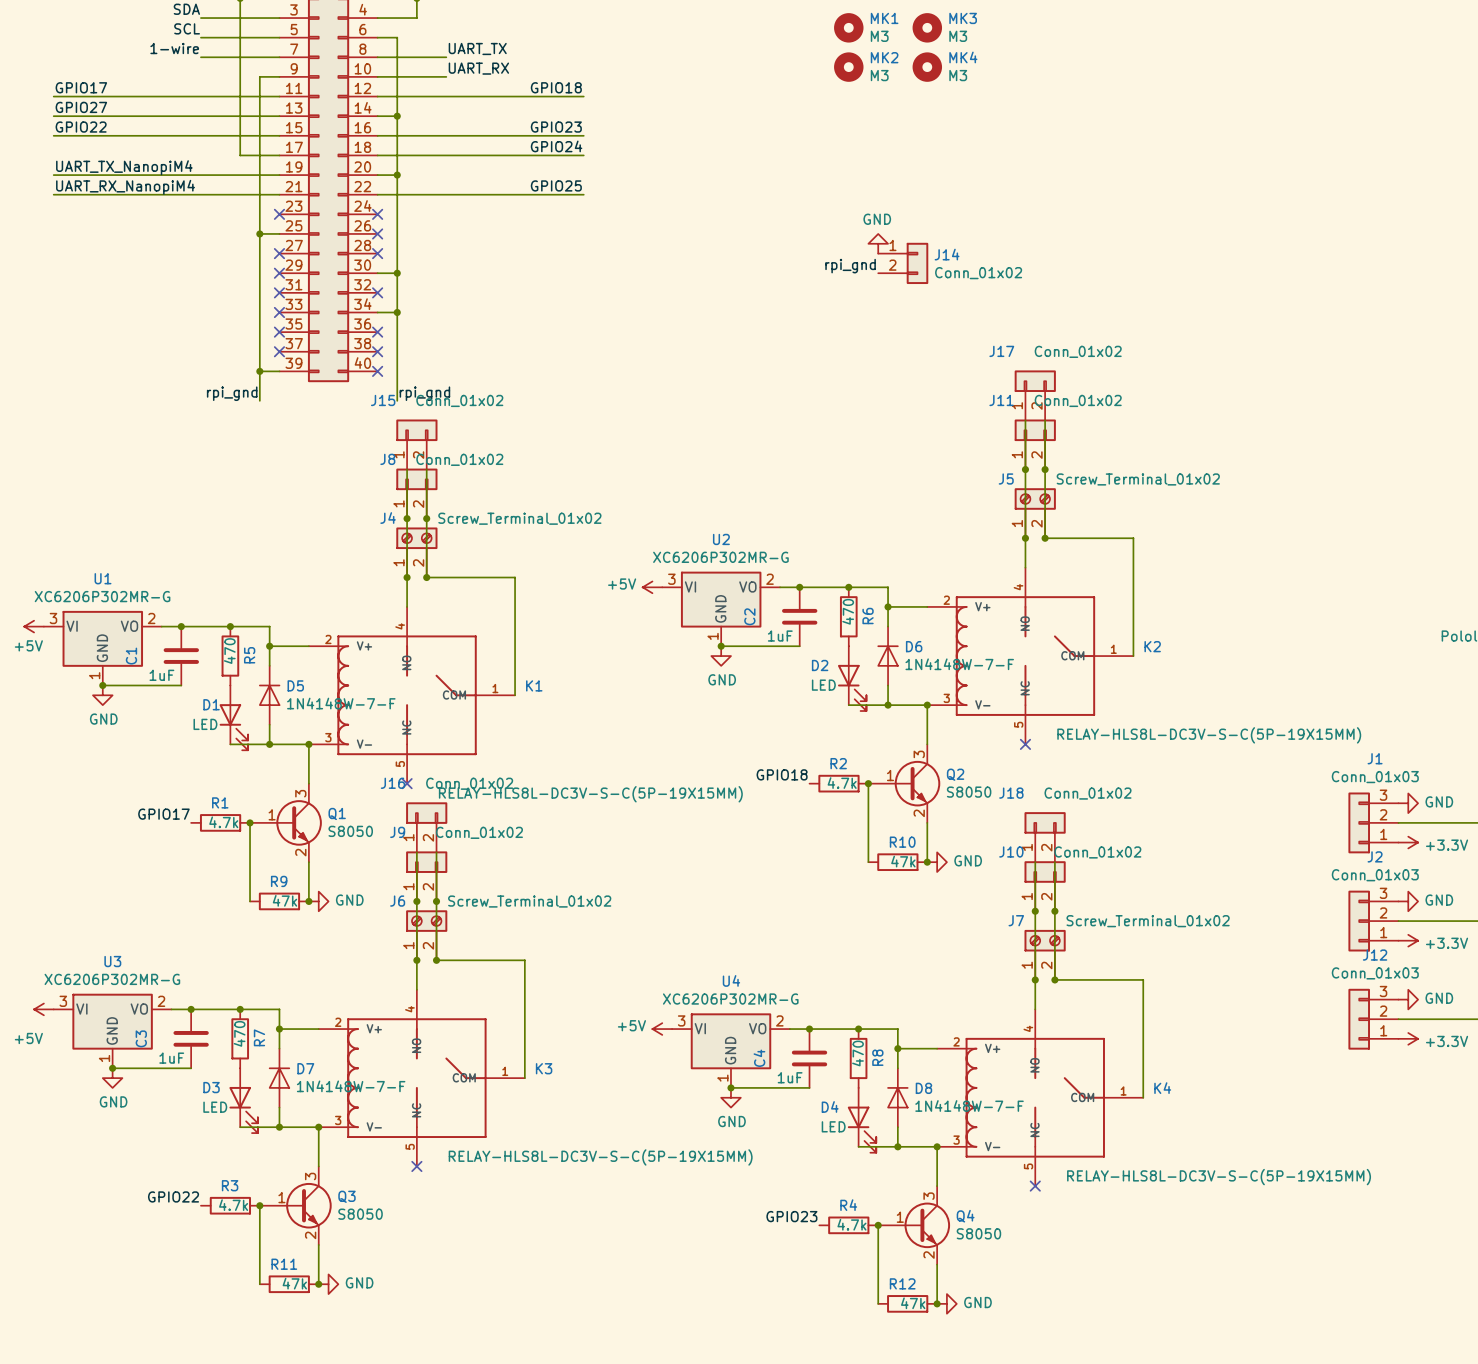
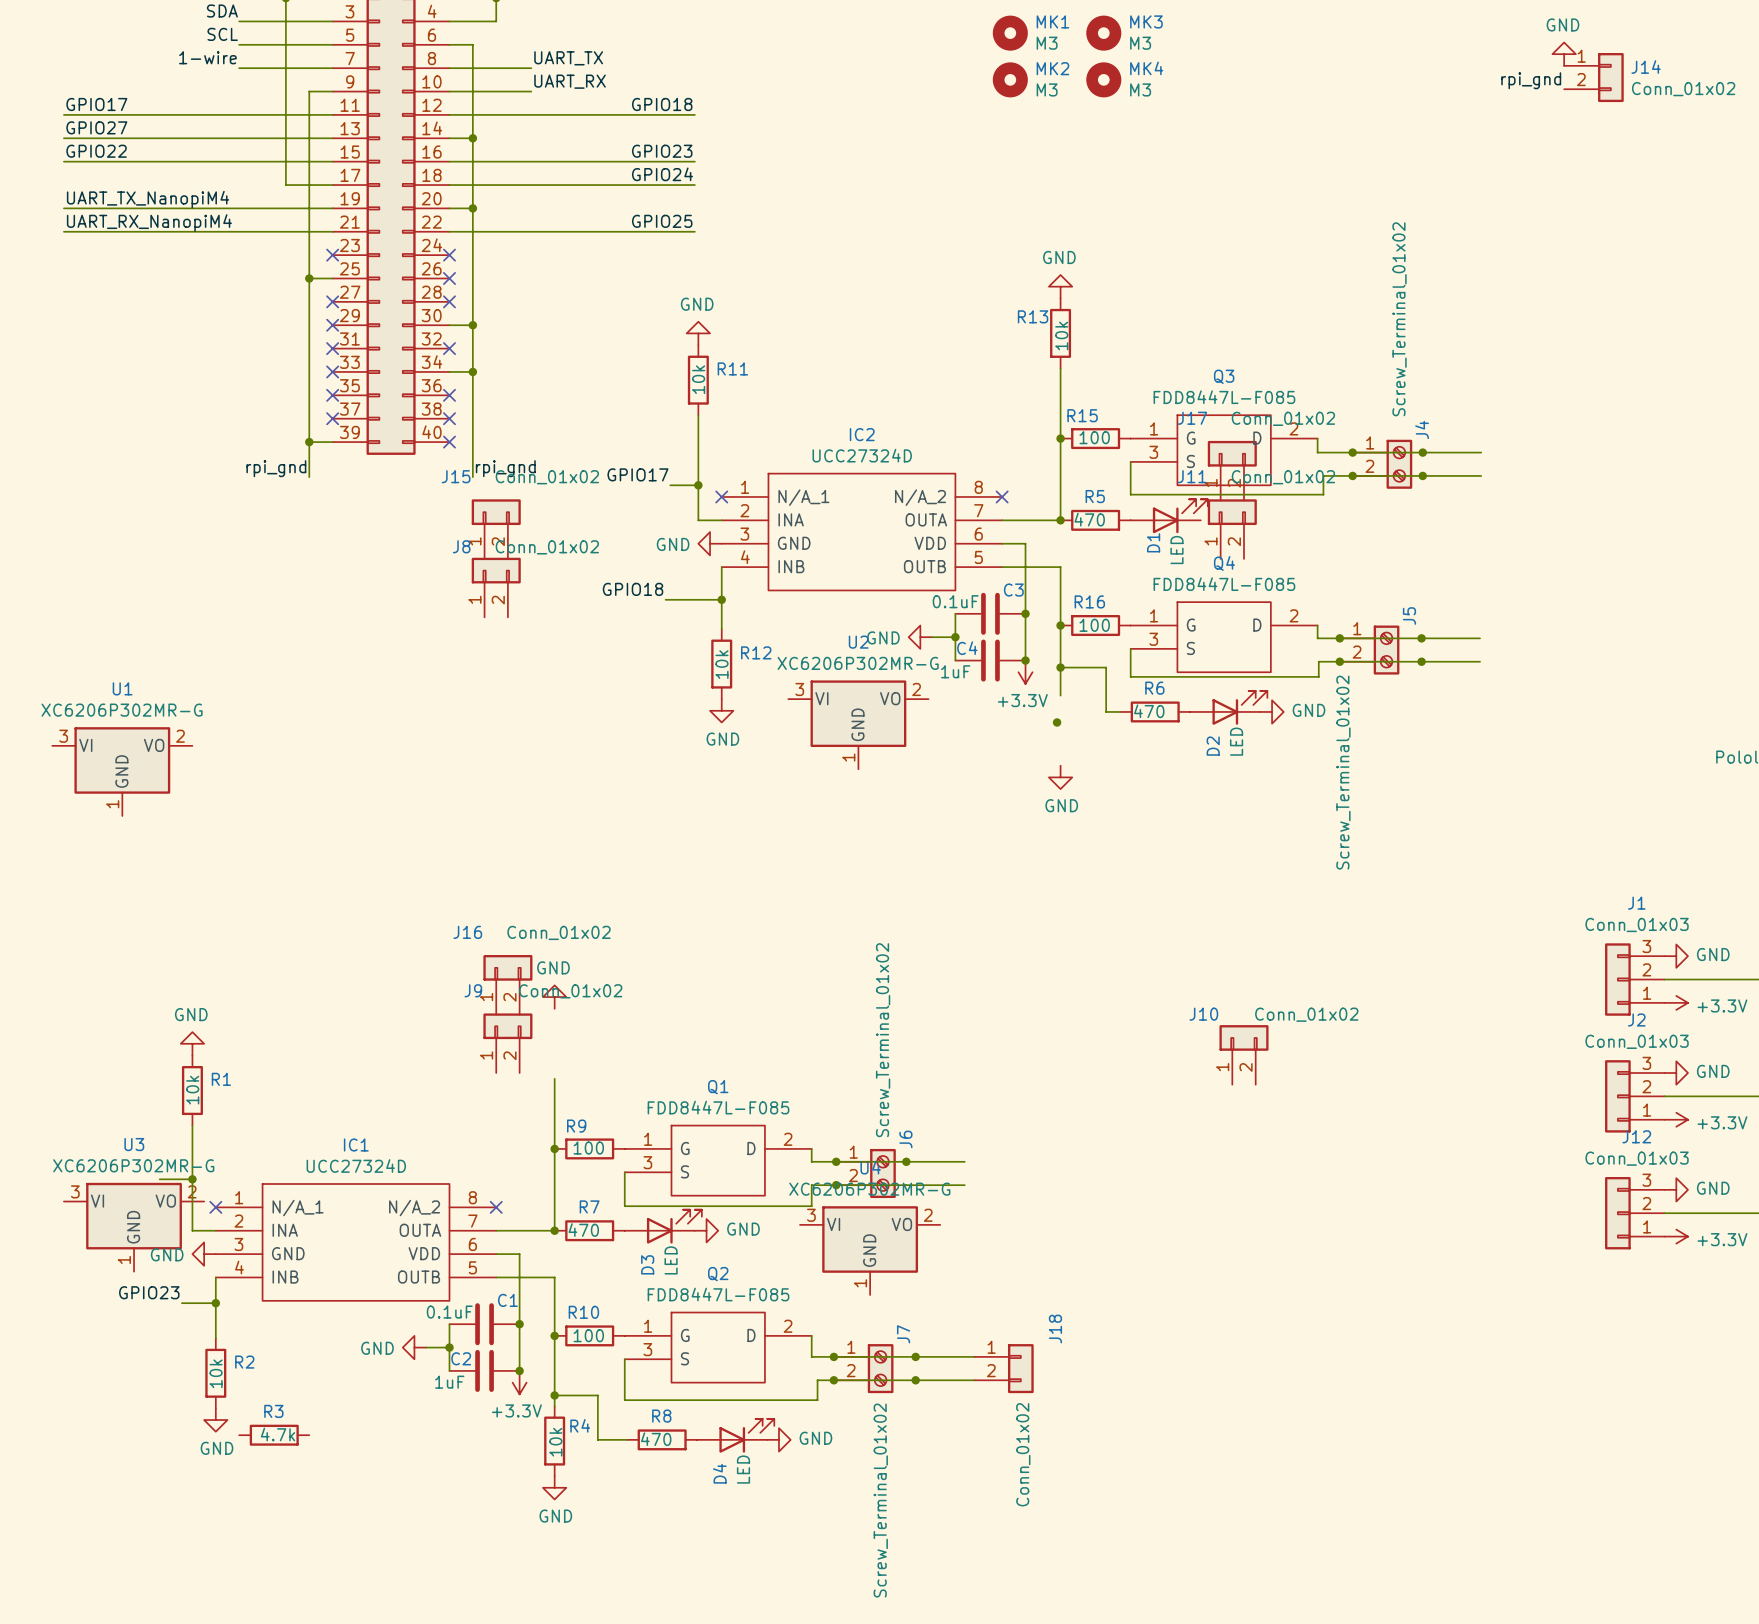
power symbol: none -> GND (1564, 54)
label: none -> rpi_gnd (1531, 80)
power symbol position: GND (878, 243) -> GND (1060, 286)
J14 position: (903, 263) -> (1593, 77)
label: rpi_gnd (850, 266) -> none
power symbol: none -> GND (698, 333)
R13: none -> 10k (1060, 333)
wire: none -> (1060, 368) (1060, 520) (1002, 520)
wire: none -> (698, 415) (698, 520) (721, 520)
junction: none -> (1060, 438)
R15: none -> 100 (1095, 438)
wire: none -> (1317, 438) (1317, 452) (1481, 452)
junction: none -> (1352, 452)
junction: none -> (1422, 452)
wire: none -> (1130, 461) (1130, 494) (1323, 494) (1323, 475) (1481, 475)
label: none -> GPIO17 (637, 474)
junction: none -> (1352, 475)
junction: none -> (1422, 475)
wire: none -> (670, 485) (698, 485)
junction: none -> (698, 485)
no-connect mark: none -> (721, 496)
no-connect mark: none -> (1002, 496)
wire: (1025, 420) (1025, 567) -> none
wire: (1045, 420) (1045, 538) (1133, 538) (1133, 656) -> none
junction: none -> (1060, 520)
IC2: none -> UCC27324D (861, 532)
power symbol: none -> GND (710, 543)
wire: none -> (1002, 543) (1025, 543) (1025, 660)
wire: (407, 469) (407, 606) -> none
wire: (426, 469) (426, 577) (515, 577) (515, 695) -> none
junction: (1025, 469) -> none
junction: (1045, 469) -> none
wire: none -> (721, 567) (721, 629)
wire: none -> (1002, 567) (1060, 567) (1060, 695)
J5 value position: Screw_Terminal_01x02 (1138, 479) -> Screw_Terminal_01x02 (1343, 772)
label: none -> GPIO18 (633, 589)
J5 rotation: 0° (1035, 498) -> 90° clockwise (1386, 650)
wire: none -> (665, 599) (721, 599)
junction: none -> (721, 599)
J5 position: (1035, 513) -> (1369, 650)
wire: none -> (955, 613) (955, 660)
junction: none -> (1025, 613)
junction: (407, 518) -> none
junction: (426, 518) -> none
J4 value position: Screw_Terminal_01x02 (519, 518) -> Screw_Terminal_01x02 (1399, 319)
junction: none -> (1060, 625)
R16: none -> 100 (1095, 625)
wire: none -> (1317, 625) (1317, 638) (1480, 638)
power symbol: none -> GND (920, 637)
wire: none -> (932, 637) (955, 637)
junction: none -> (955, 637)
junction: none -> (1339, 638)
junction: none -> (1421, 638)
J4 rotation: 0° (416, 538) -> 90° clockwise (1399, 464)
junction: (1025, 538) -> none
junction: (1045, 538) -> none
wire: none -> (1130, 648) (1130, 676) (1318, 676) (1318, 661) (1480, 661)
J4 position: (416, 552) -> (1382, 464)
junction: none -> (1025, 660)
junction: none -> (1339, 661)
junction: none -> (1421, 661)
wire: none -> (1060, 667) (1106, 667) (1106, 711) (1120, 711)
junction: none -> (1060, 667)
power symbol: none -> +3.3V (1025, 672)
junction: (407, 577) -> none
junction: (426, 577) -> none
power symbol: +5V (652, 587) -> none
wire: (780, 587) (888, 587) (888, 626) -> none
junction: (799, 587) -> none
junction: (848, 587) -> none
power symbol: none -> GND (721, 710)
power symbol: none -> GND (1272, 711)
wire: (888, 606) (927, 606) -> none
C2 name position: C2 (749, 616) -> C2 (461, 1358)
C2 rotation: 0° (799, 616) -> 90° clockwise (484, 1370)
C2 position: (799, 616) -> (484, 1370)
R6 rotation: 0° (848, 616) -> 90° clockwise (1155, 711)
R6 position: (848, 616) -> (1155, 711)
R6 name position: R6 (868, 616) -> R6 (1154, 688)
power symbol: +5V (34, 626) -> none
wire: (161, 626) (269, 626) (269, 665) -> none
junction: (181, 626) -> none
junction: (230, 626) -> none
wire: (269, 646) (308, 646) -> none
junction: (269, 646) -> none
wire: (721, 646) (799, 646) -> none
junction: (721, 646) -> none
power symbol: none -> GND (1060, 777)
R5 name position: R5 (249, 655) -> R5 (1095, 496)
C1 name position: C1 (131, 656) -> C1 (507, 1300)
C1 rotation: 0° (181, 656) -> 90° clockwise (484, 1324)
C1 position: (181, 656) -> (484, 1324)
R5 rotation: 0° (230, 656) -> 90° clockwise (1095, 520)
R5 position: (230, 656) -> (1095, 520)
power symbol: GND (721, 656) -> none
D6: 1N4148W-7-F (888, 656) -> none
K2: RELAY-HLS8L-DC3V-S-C(5P-19X15MM) (1030, 656) -> none
C1 value: 1uF (161, 675) -> 0.1uF (449, 1312)
D2 position: (852, 678) -> (1228, 707)
wire: (102, 685) (181, 685) -> none
junction: (102, 685) -> none
wire: (888, 685) (888, 705) -> none
D2 rotation: 0° (852, 687) -> 90° counterclockwise (1239, 707)
power symbol: GND (102, 695) -> none
D5: 1N4148W-7-F (269, 695) -> none
K1: RELAY-HLS8L-DC3V-S-C(5P-19X15MM) (411, 695) -> none
wire: (848, 705) (927, 705) (927, 744) -> none
junction: (888, 705) -> none
junction: (927, 705) -> none
D1 position: (233, 717) -> (1169, 516)
wire: (269, 724) (269, 744) -> none
D1 rotation: 0° (233, 727) -> 90° counterclockwise (1180, 516)
wire: (230, 744) (308, 744) (308, 783) -> none
junction: (269, 744) -> none
junction: (308, 744) -> none
Q2 symbol: [868, 744, 941, 823] -> [624, 1311, 812, 1384]
no-connect mark: (1025, 744) -> none
label: GPIO18 (782, 774) -> none
Q2 name position: Q2 (955, 774) -> Q2 (718, 1274)
Q1 symbol: [250, 783, 322, 863] -> [624, 1124, 812, 1197]
no-connect mark: (407, 783) -> none
R2 rotation: 0° (838, 783) -> 90° clockwise (215, 1373)
R2 position: (838, 783) -> (215, 1373)
R2 value: 4.7k (842, 783) -> 10k (216, 1373)
wire: (868, 783) (868, 862) -> none
junction: (868, 783) -> none
Q2 value: S8050 (969, 792) -> FDD8447L-F085 (718, 1294)
J18 value position: Conn_01x02 (1088, 793) -> Conn_01x02 (1023, 1454)
Q1 name position: Q1 (337, 813) -> Q1 (718, 1087)
label: GPIO17 (163, 814) -> none
R1 rotation: 0° (220, 822) -> 90° clockwise (192, 1090)
R1 position: (220, 822) -> (192, 1090)
R1 value: 4.7k (223, 822) -> 10k (192, 1090)
wire: (250, 822) (250, 901) -> none
junction: (250, 822) -> none
wire: (927, 822) (927, 862) -> none
J18 rotation: 0° (1045, 822) -> 90° clockwise (1020, 1368)
Q1 value: S8050 (350, 831) -> FDD8447L-F085 (718, 1107)
power symbol: none -> GND (554, 997)
J18 position: (1045, 837) -> (1003, 1368)
R10 name position: R10 (902, 842) -> R10 (583, 1312)
wire: (416, 852) (416, 989) -> none
wire: (436, 852) (436, 960) (524, 960) (524, 984) -> none
R10 value: 47k (903, 861) -> 100 (588, 1335)
wire: (308, 862) (308, 901) -> none
R10 position: (897, 862) -> (589, 1335)
junction: (927, 862) -> none
power symbol: GND (937, 862) -> none
wire: (1035, 862) (1035, 1009) -> none
wire: (1054, 862) (1054, 979) (1143, 979) (1143, 1097) -> none
power symbol: none -> GND (192, 1043)
R9 name position: R9 (279, 881) -> R9 (576, 1126)
R9 value: 47k (285, 900) -> 100 (588, 1148)
R9 position: (279, 901) -> (589, 1148)
junction: (308, 901) -> none
power symbol: GND (318, 901) -> none
junction: (416, 901) -> none
junction: (436, 901) -> none
J6 value position: Screw_Terminal_01x02 (529, 901) -> Screw_Terminal_01x02 (883, 1040)
wire: none -> (554, 1078) (554, 1230) (496, 1230)
junction: (1035, 911) -> none
junction: (1054, 911) -> none
J6 rotation: 0° (426, 921) -> 90° clockwise (882, 1173)
J7 value position: Screw_Terminal_01x02 (1148, 921) -> Screw_Terminal_01x02 (880, 1500)
J6 position: (426, 935) -> (866, 1173)
J7 rotation: 0° (1045, 940) -> 90° clockwise (880, 1368)
wire: none -> (192, 1125) (192, 1230) (215, 1230)
J7 position: (1045, 954) -> (863, 1368)
junction: (416, 960) -> none
junction: (436, 960) -> none
junction: none -> (554, 1148)
wire: none -> (811, 1148) (811, 1161) (964, 1161)
junction: none -> (836, 1161)
junction: none -> (906, 1161)
junction: (1035, 979) -> none
junction: (1054, 979) -> none
wire: none -> (159, 1179) (192, 1179)
junction: none -> (836, 1185)
power symbol: +5V (43, 1009) -> none
wire: (171, 1009) (279, 1009) (279, 1048) -> none
junction position: (191, 1009) -> (192, 1179)
junction: (240, 1009) -> none
wire: (524, 1013) (524, 1078) -> (624, 1206) (811, 1206) (811, 1185) (964, 1185)
no-connect mark: none -> (215, 1207)
no-connect mark: none -> (496, 1207)
wire: (279, 1029) (318, 1029) -> none
junction: (279, 1029) -> none
power symbol: +5V (662, 1029) -> none
wire: (789, 1029) (897, 1029) (897, 1068) -> none
junction: (809, 1029) -> none
junction: (858, 1029) -> none
junction: none -> (554, 1230)
power symbol: none -> GND (706, 1230)
R7 name position: R7 (259, 1037) -> R7 (589, 1206)
C3 name position: C3 (141, 1038) -> C3 (1013, 590)
C3 rotation: 0° (191, 1038) -> 90° clockwise (990, 613)
C3 position: (191, 1038) -> (990, 613)
R7 rotation: 0° (240, 1038) -> 90° clockwise (589, 1230)
R7 position: (240, 1038) -> (589, 1230)
IC1: none -> UCC27324D (356, 1242)
wire: (897, 1048) (937, 1048) -> none
junction: (897, 1048) -> none
wire: none -> (496, 1254) (519, 1254) (519, 1370)
R8 name position: R8 (877, 1057) -> R8 (661, 1416)
C3 value: 1uF (171, 1058) -> 0.1uF (955, 601)
C4 name position: C4 (759, 1058) -> C4 (967, 648)
C4 rotation: 0° (809, 1058) -> 90° clockwise (990, 660)
C4 position: (809, 1058) -> (990, 660)
R8 rotation: 0° (858, 1058) -> 90° clockwise (662, 1439)
R8 position: (858, 1058) -> (662, 1439)
wire: (112, 1068) (191, 1068) -> none
junction: (112, 1068) -> none
wire: none -> (215, 1277) (215, 1338)
wire: none -> (496, 1277) (554, 1277) (554, 1405)
power symbol rotation: 0° (112, 1078) -> 90° clockwise (204, 1254)
power symbol position: GND (112, 1078) -> GND (204, 1254)
D7: 1N4148W-7-F (279, 1078) -> none
K3: RELAY-HLS8L-DC3V-S-C(5P-19X15MM) (421, 1078) -> none
label: none -> GPIO23 (149, 1292)
wire: (730, 1087) (809, 1087) -> none
junction: (730, 1087) -> none
wire: none -> (181, 1303) (215, 1303)
junction: none -> (215, 1303)
power symbol: GND (730, 1097) -> none
D8: 1N4148W-7-F (897, 1097) -> none
K4: RELAY-HLS8L-DC3V-S-C(5P-19X15MM) (1040, 1097) -> none
D3 position: (243, 1100) -> (663, 1226)
wire: (279, 1107) (279, 1127) -> none
D3 rotation: 0° (243, 1110) -> 90° counterclockwise (674, 1226)
junction: none -> (519, 1324)
D4 position: (862, 1120) -> (735, 1435)
junction: none -> (554, 1335)
wire: none -> (811, 1335) (811, 1356) (974, 1356)
wire: (240, 1127) (318, 1127) (318, 1166) -> none
junction: (279, 1127) -> none
junction: (318, 1127) -> none
wire: (897, 1127) (897, 1146) -> none
D4 rotation: 0° (862, 1129) -> 90° counterclockwise (746, 1435)
power symbol: none -> GND (414, 1347)
wire: none -> (426, 1347) (449, 1347)
junction: none -> (449, 1347)
junction: none -> (833, 1356)
junction: none -> (915, 1356)
wire: none -> (624, 1359) (624, 1400) (817, 1400) (817, 1380) (974, 1380)
wire: (858, 1146) (937, 1146) (937, 1186) -> none
junction: (897, 1146) -> none
junction: (937, 1146) -> none
junction: none -> (519, 1370)
junction: none -> (833, 1380)
junction: none -> (915, 1380)
power symbol: none -> +3.3V (519, 1382)
Q3 symbol: [259, 1166, 332, 1245] -> [1130, 414, 1318, 487]
no-connect mark: (416, 1166) -> none
wire: none -> (554, 1395) (597, 1395) (597, 1439) (627, 1439)
junction: none -> (554, 1395)
Q4 symbol: [878, 1186, 951, 1265] -> [1130, 601, 1318, 673]
no-connect mark: (1035, 1186) -> none
power symbol: none -> GND (215, 1420)
label: GPIO22 (173, 1196) -> none
Q3 name position: Q3 (346, 1196) -> Q3 (1224, 376)
wire: (259, 1205) (259, 1284) -> none
junction: (259, 1205) -> none
power symbol: none -> GND (778, 1439)
Q3 value: S8050 (360, 1214) -> FDD8447L-F085 (1224, 397)
label: GPIO23 (791, 1216) -> none
Q4 name position: Q4 (965, 1216) -> Q4 (1224, 563)
R4 value: 4.7k (851, 1224) -> 10k (555, 1442)
R4 rotation: 0° (848, 1225) -> 90° clockwise (554, 1441)
R4 position: (848, 1225) -> (554, 1441)
wire: (878, 1225) (878, 1303) -> none
junction: (878, 1225) -> none
Q4 value: S8050 (978, 1233) -> FDD8447L-F085 (1224, 584)
wire: (318, 1244) (318, 1284) -> (449, 1324) (449, 1370)
power symbol: none -> GND (554, 1487)
wire: (937, 1264) (937, 1303) -> none
R11 value: 47k (294, 1283) -> 10k (698, 379)
R11 rotation: 0° (289, 1284) -> 90° clockwise (698, 380)
R11 position: (289, 1284) -> (698, 380)
junction: (318, 1284) -> none
power symbol: GND (328, 1284) -> none
R12 rotation: 0° (907, 1303) -> 90° clockwise (721, 664)
R12 position: (907, 1303) -> (721, 664)
R12 value: 47k (913, 1303) -> 10k (721, 664)
junction: (937, 1303) -> none
power symbol: GND (946, 1303) -> none

